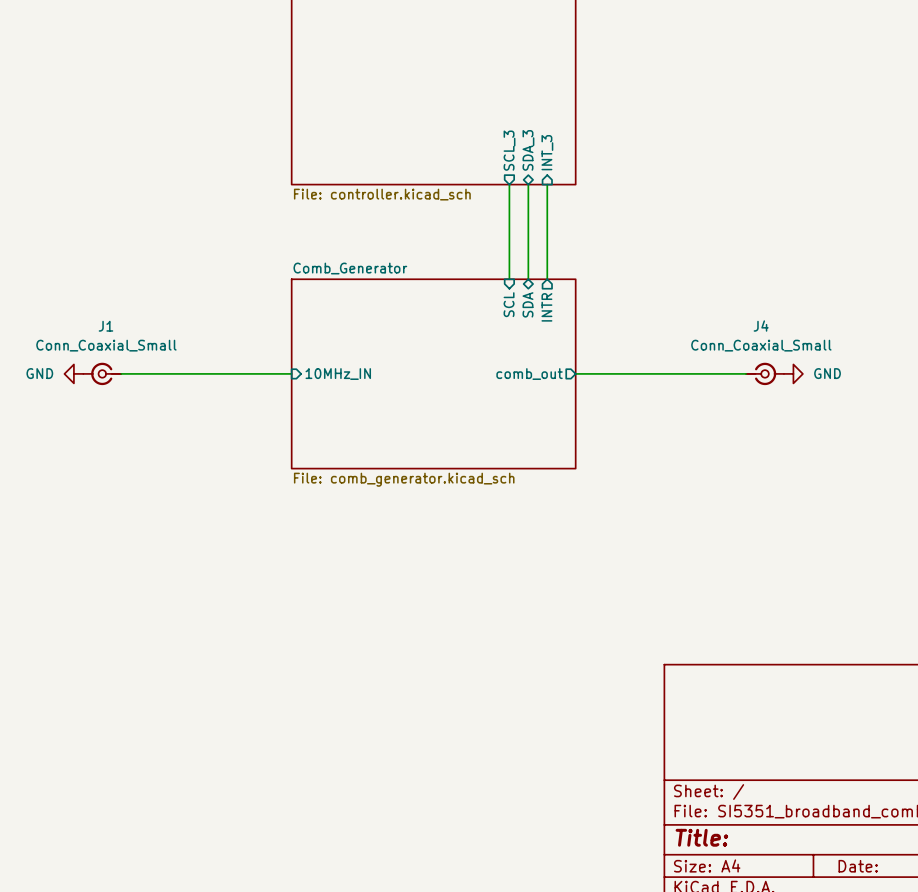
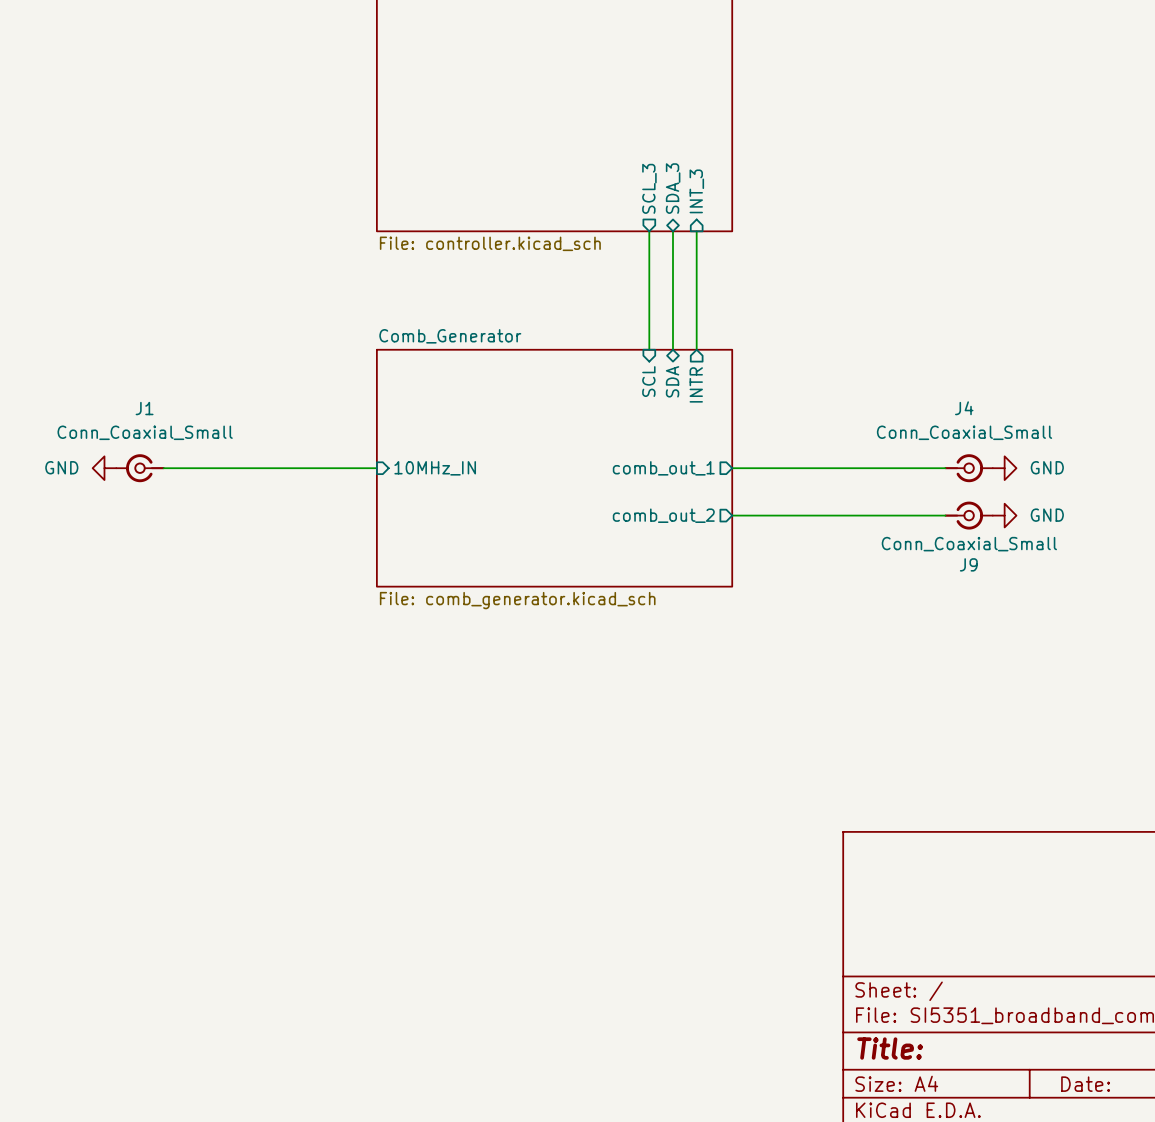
sheet pin: comb_out (529, 374) -> comb_out_1 (663, 468)
sheet pin: none -> comb_out_2 (663, 515)
wire: none -> (732, 515) (945, 515)
J9: none -> Conn_Coaxial_Small (969, 515)
power symbol: none -> GND (1004, 515)

